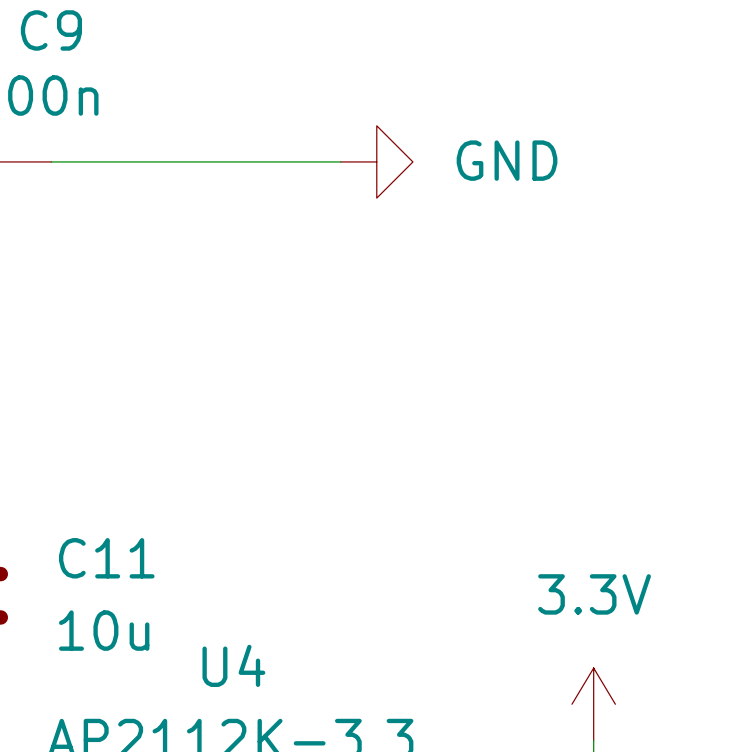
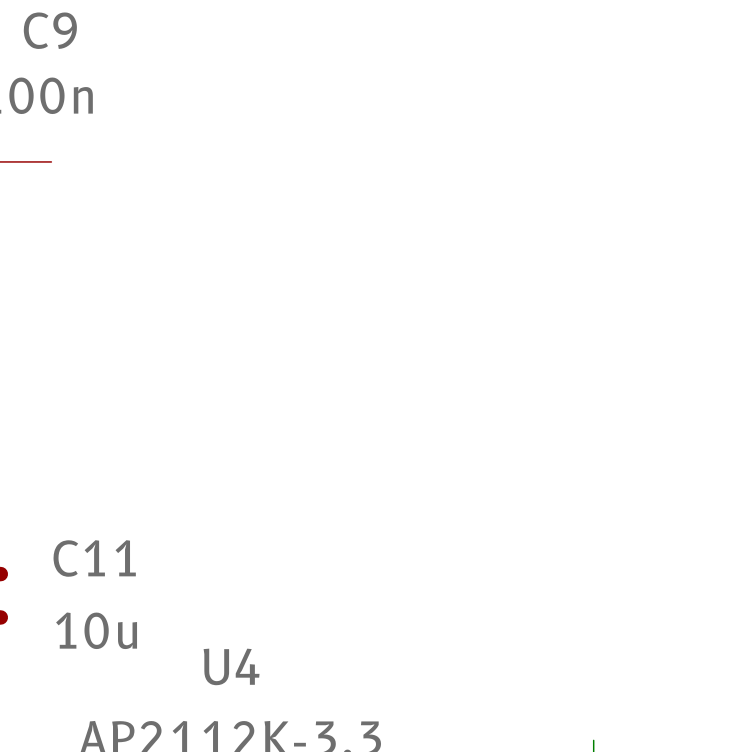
wire: (51, 161) (340, 161) -> none
power symbol: GND (376, 161) -> none
power symbol: 3.3V (593, 704) -> none

